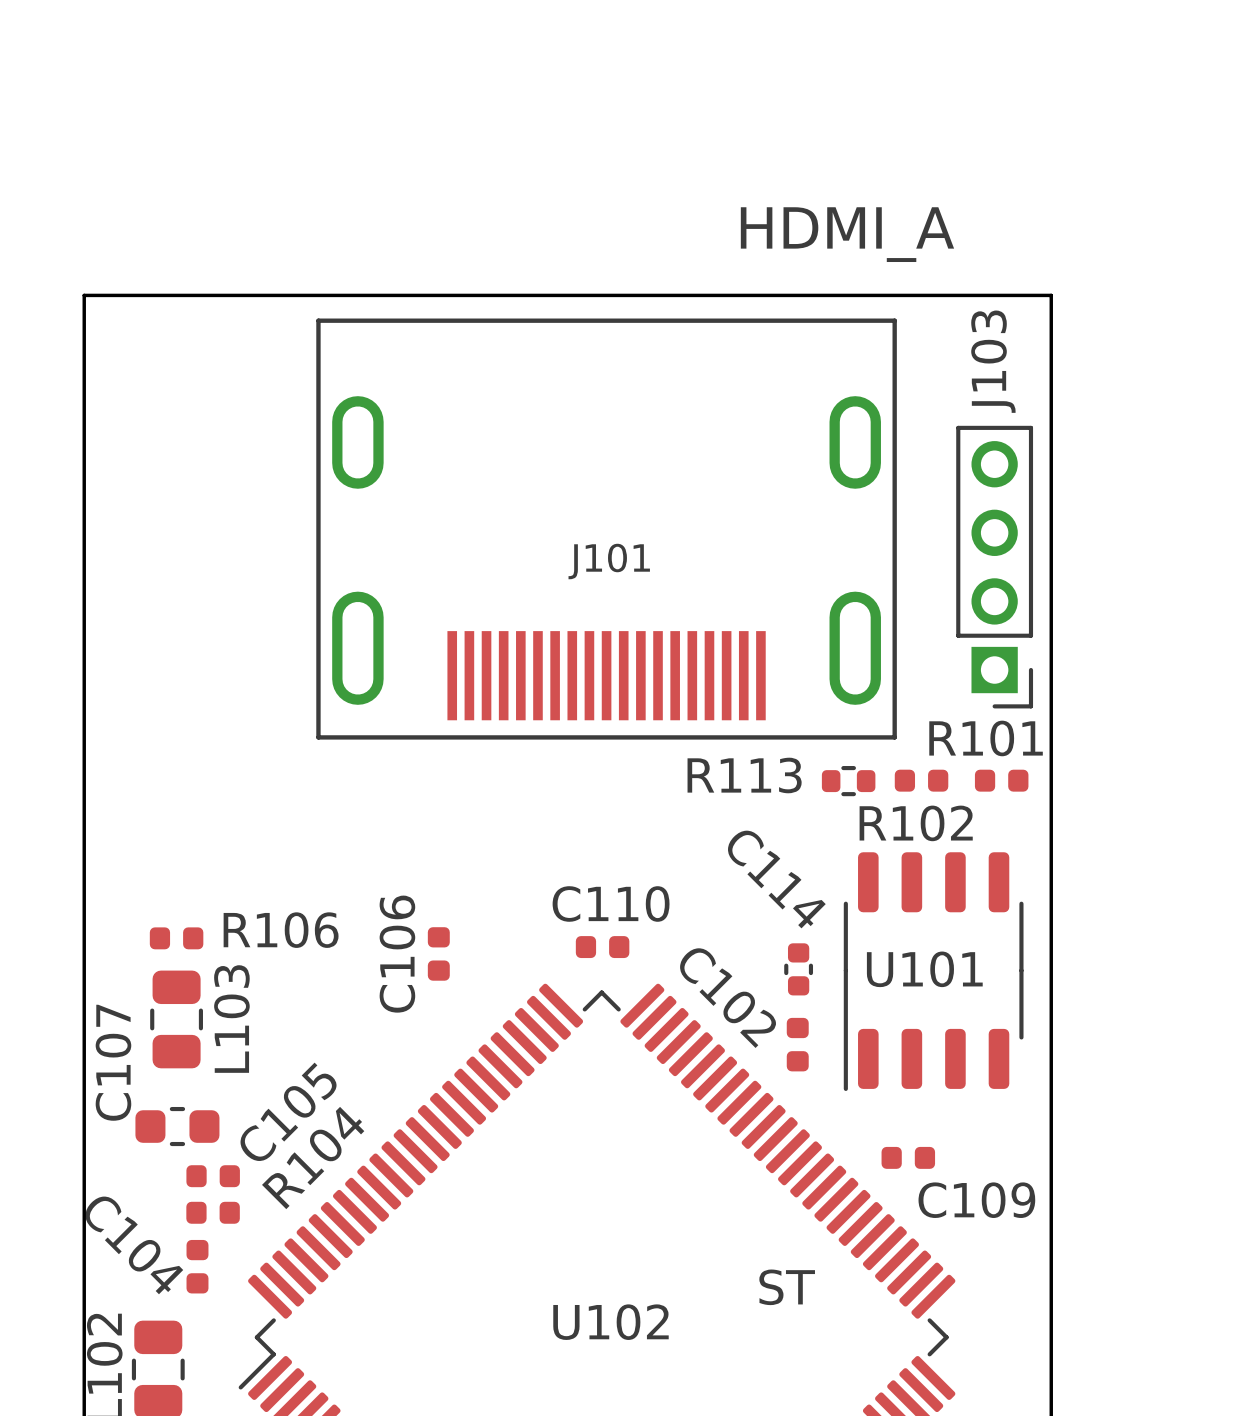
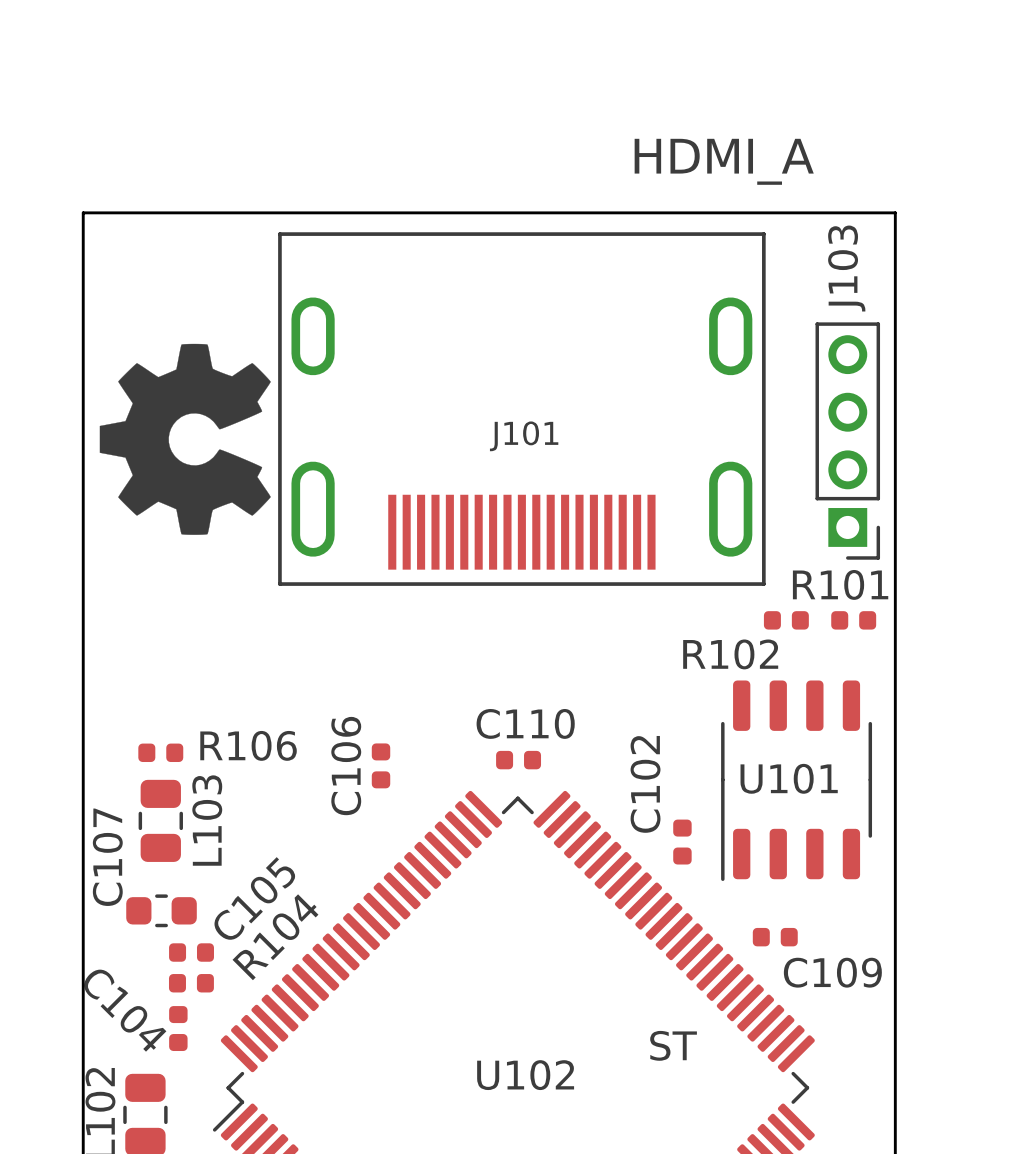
drawing: none -> [99, 343, 271, 535]
R113: (848, 781) -> none
R102 name position: R102 (916, 823) -> R102 (730, 654)
C114: (798, 969) -> none
C102 name rotation: 0° (728, 998) -> 135° counterclockwise (645, 784)

